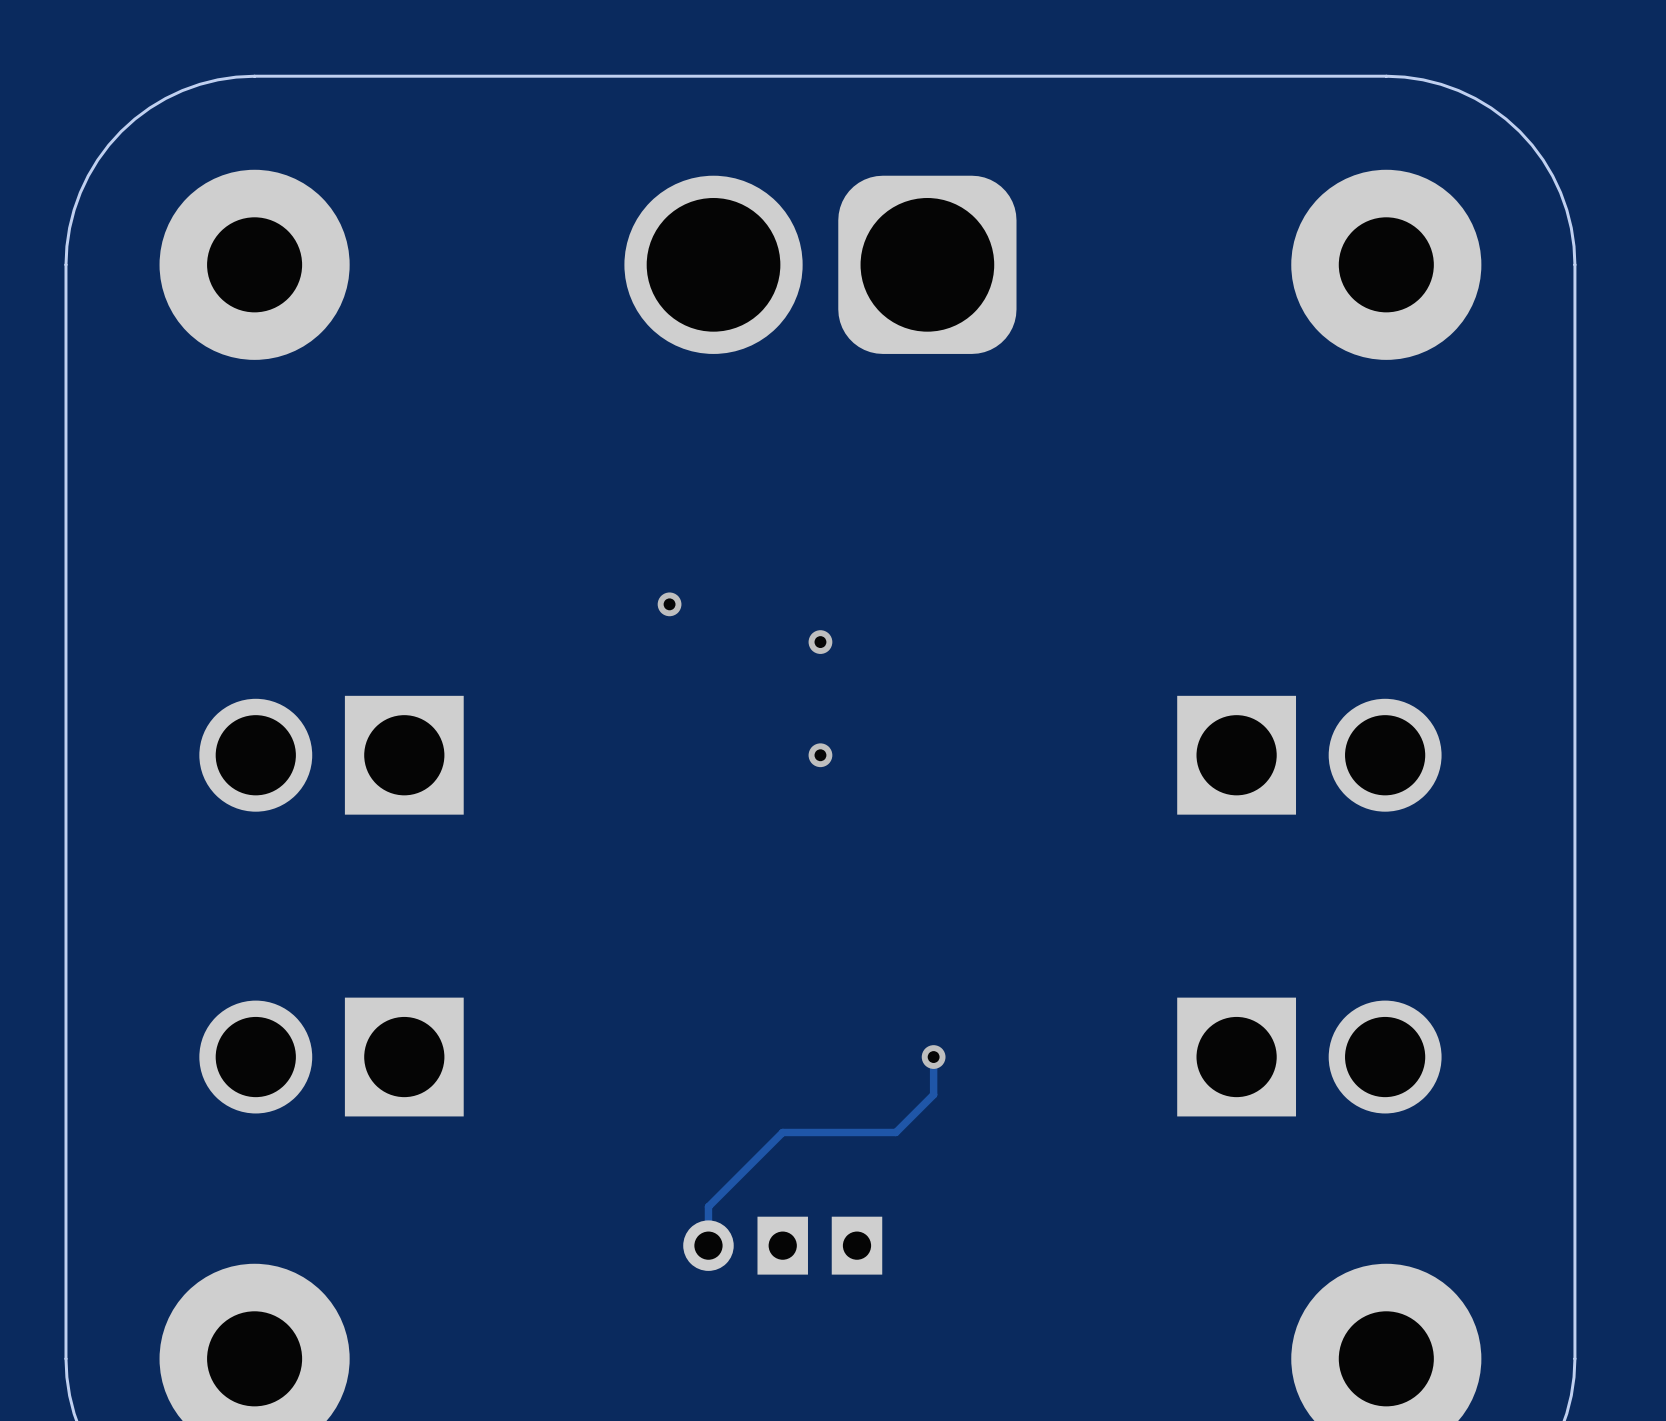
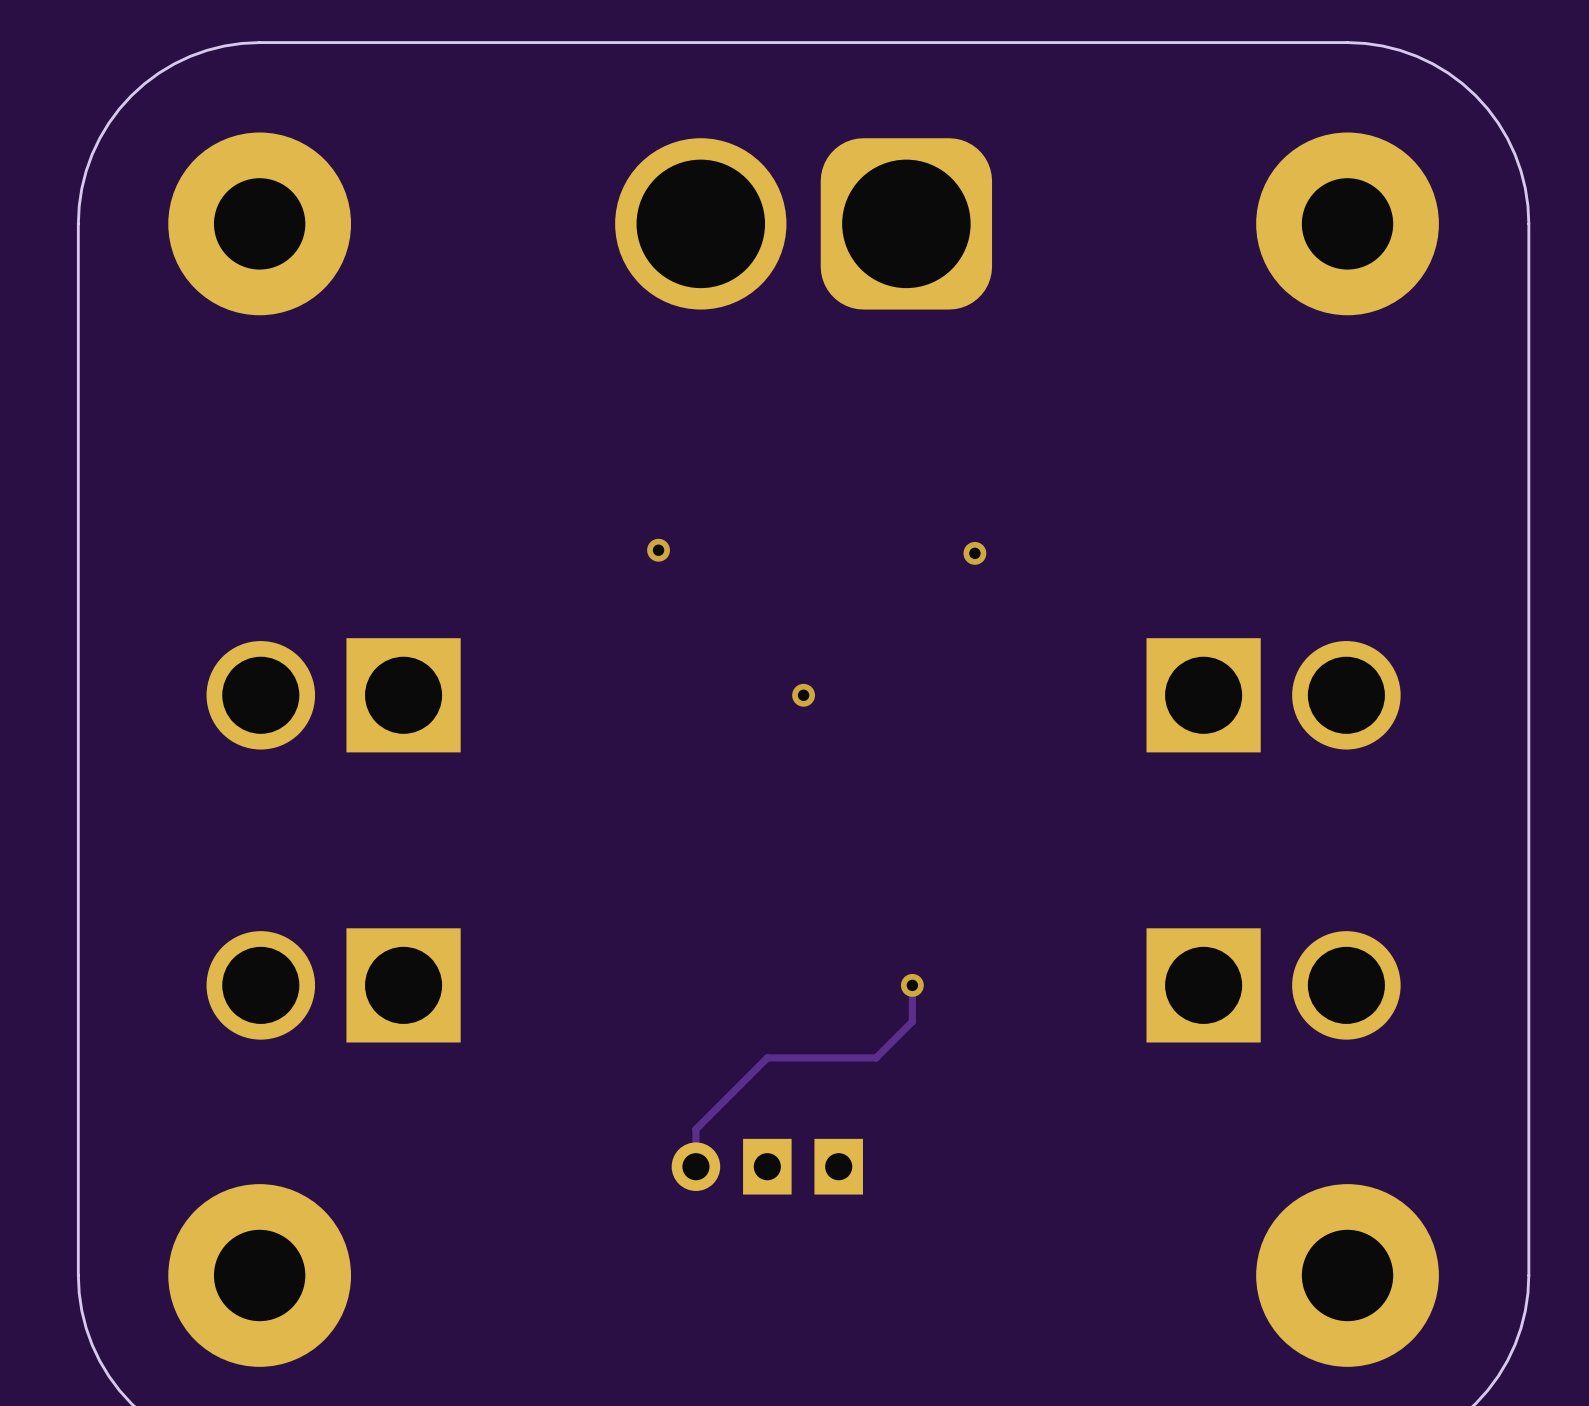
via: none -> (974, 553)
via: (820, 642) -> none

